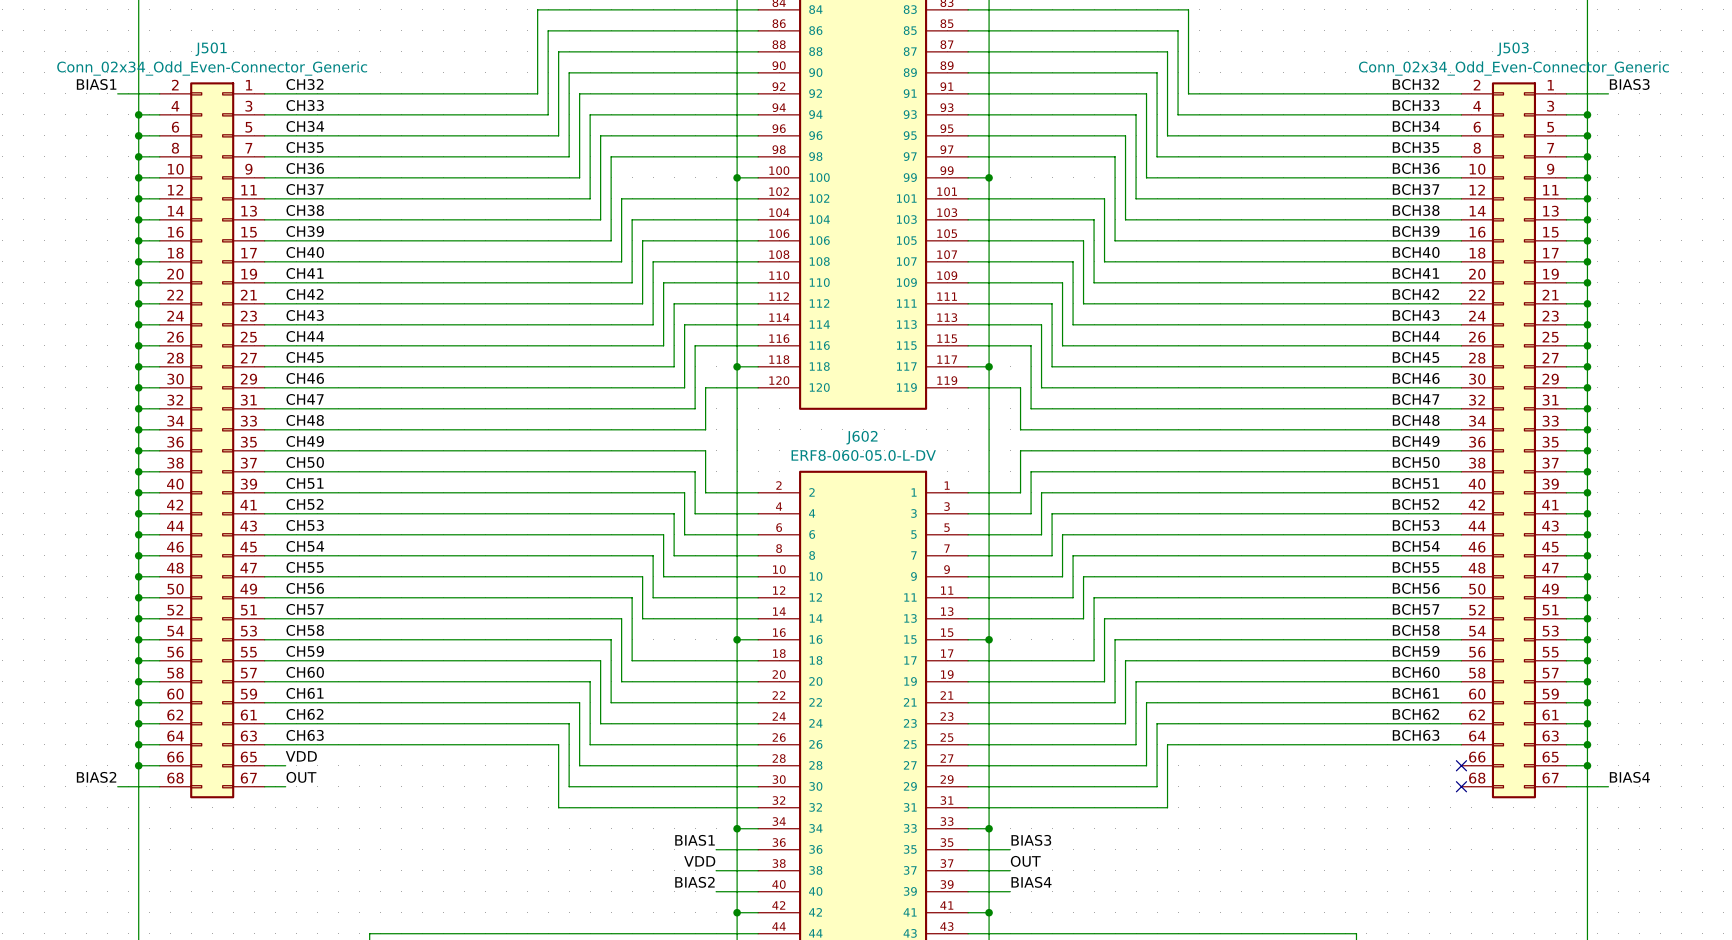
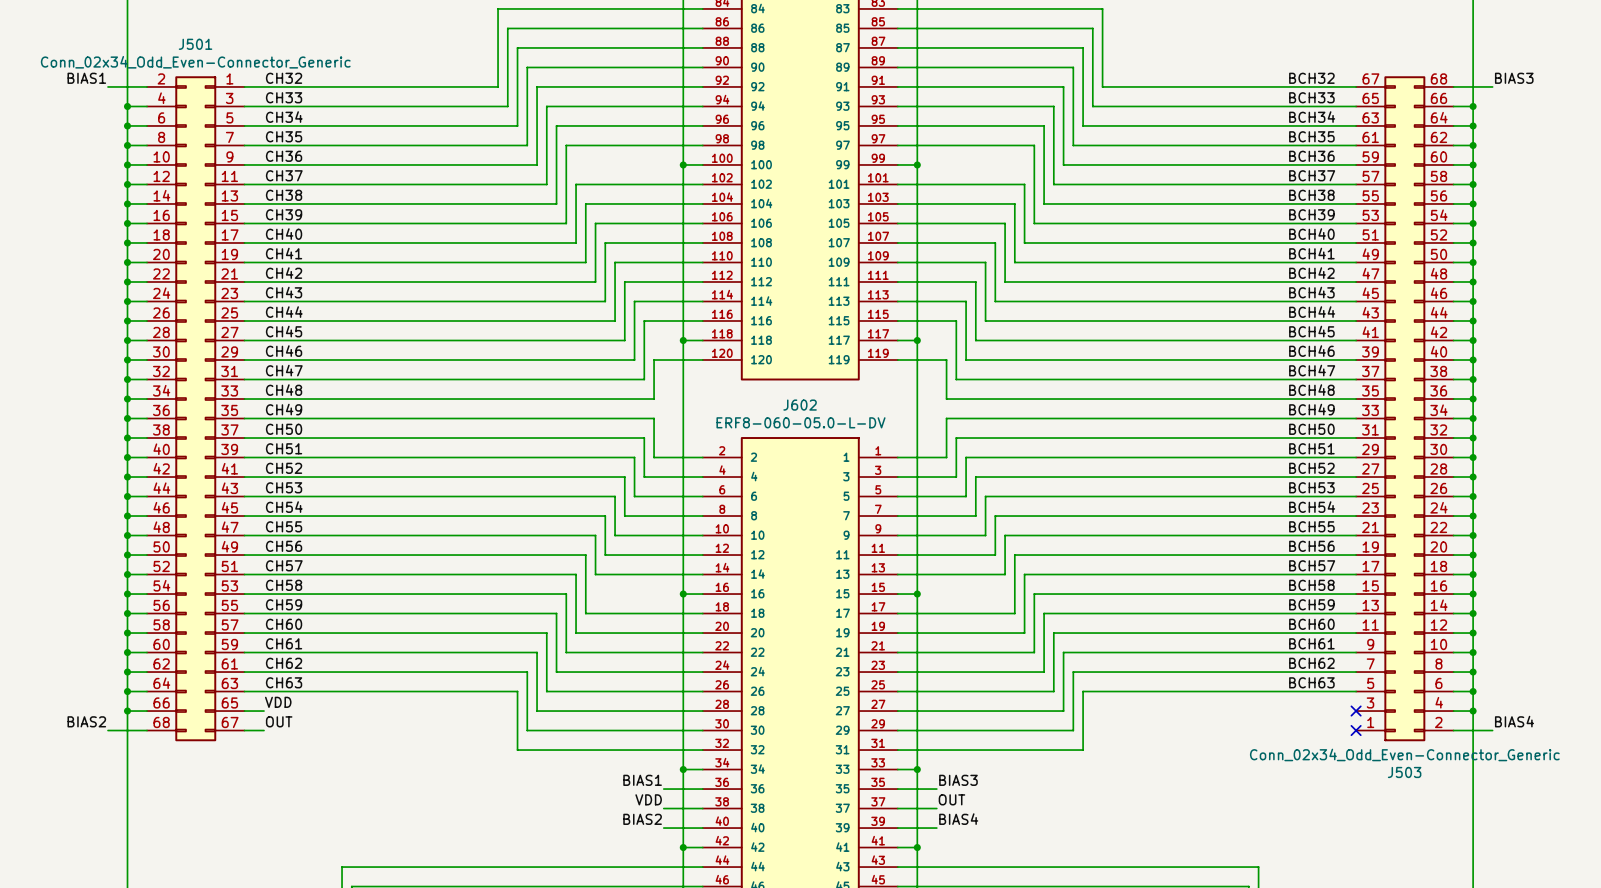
J503 rotation: 0° (1513, 440) -> 180° (1404, 408)

